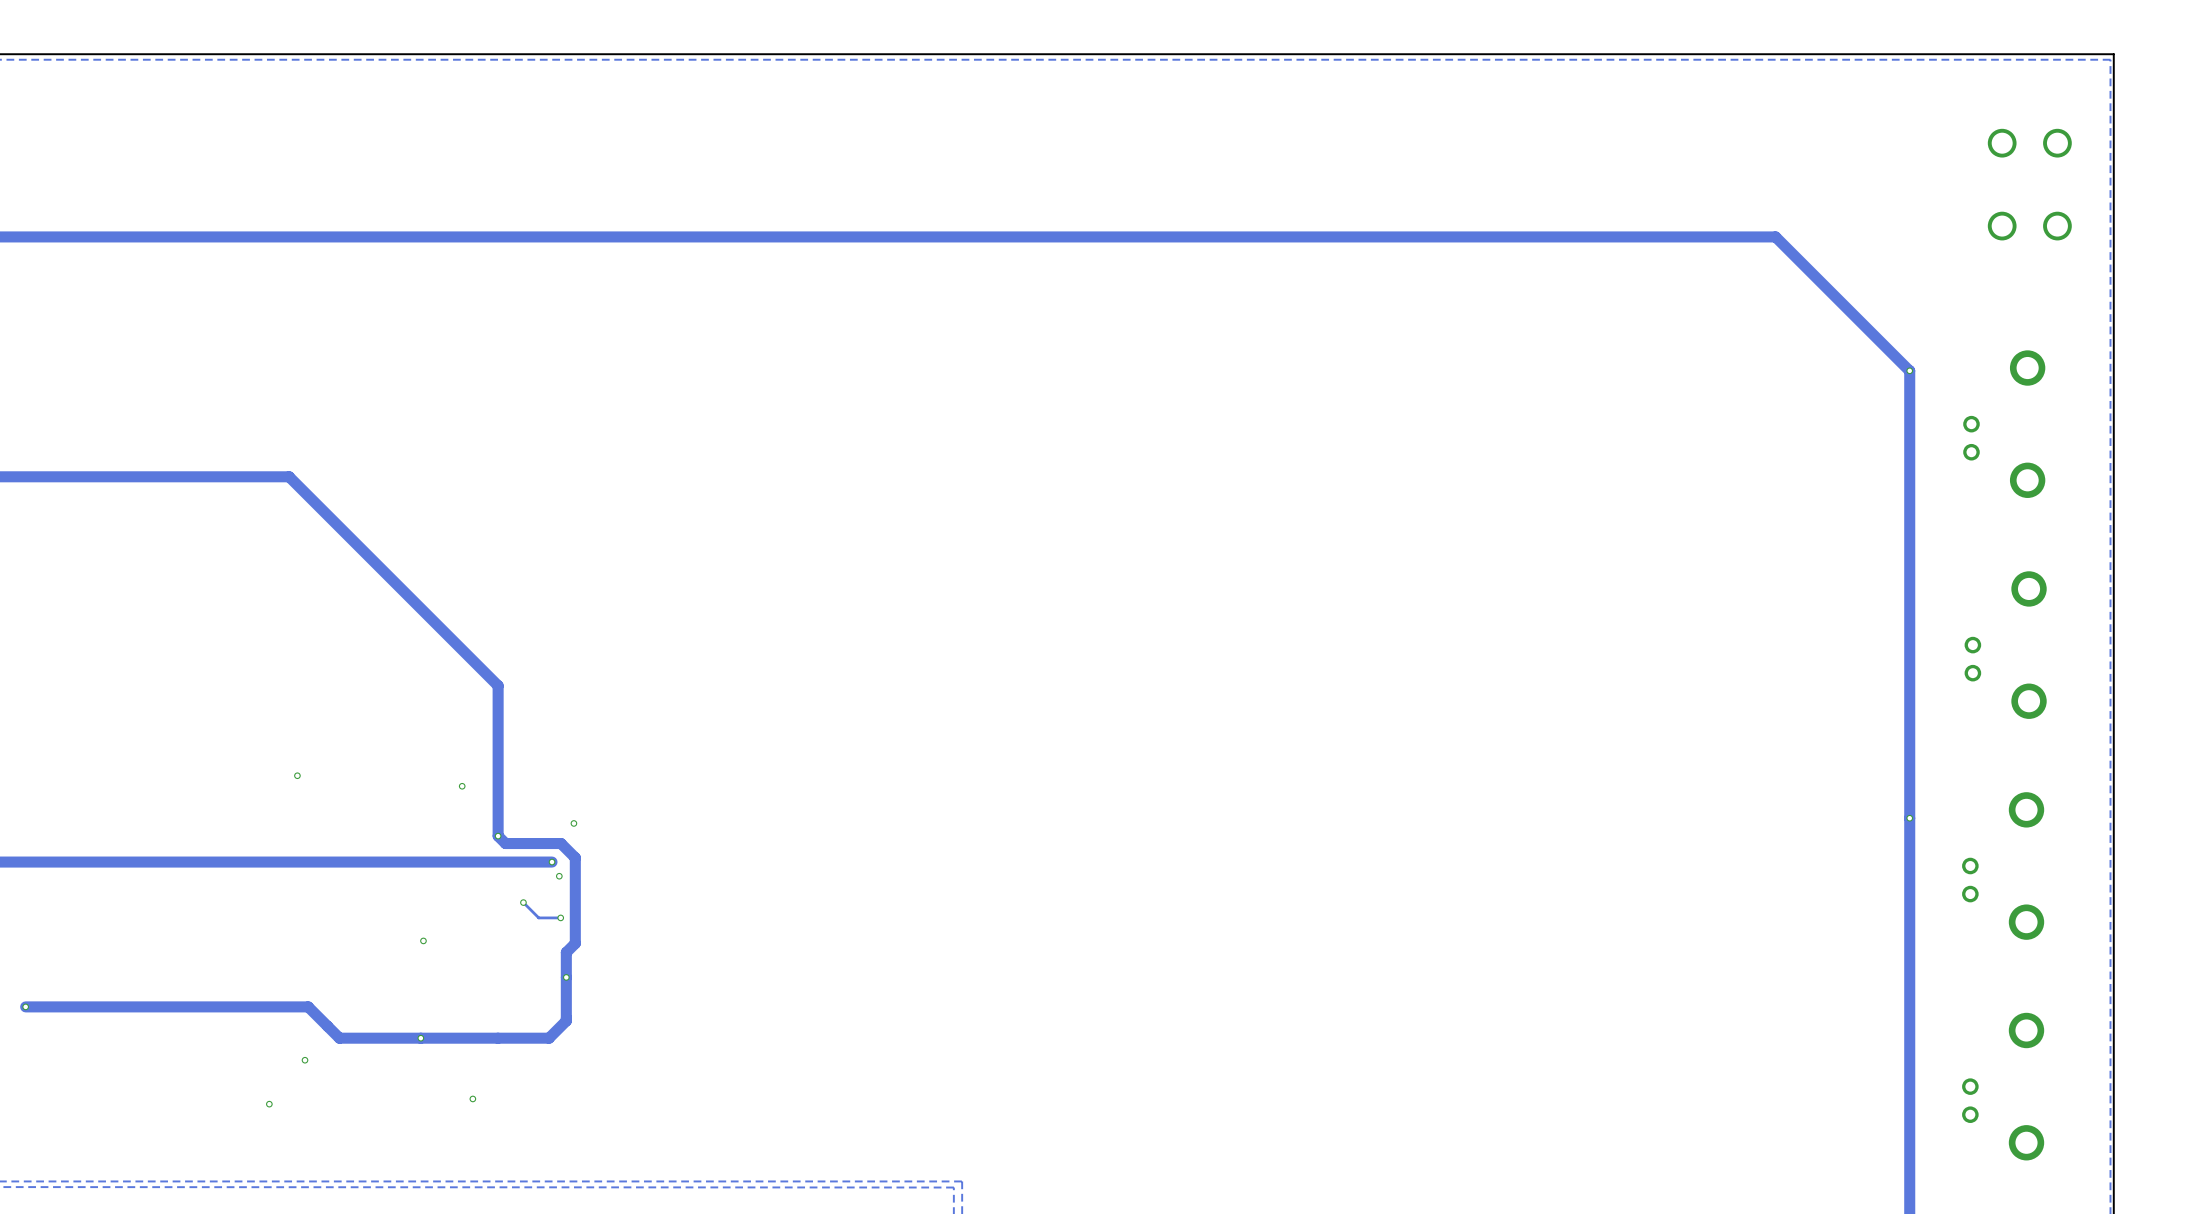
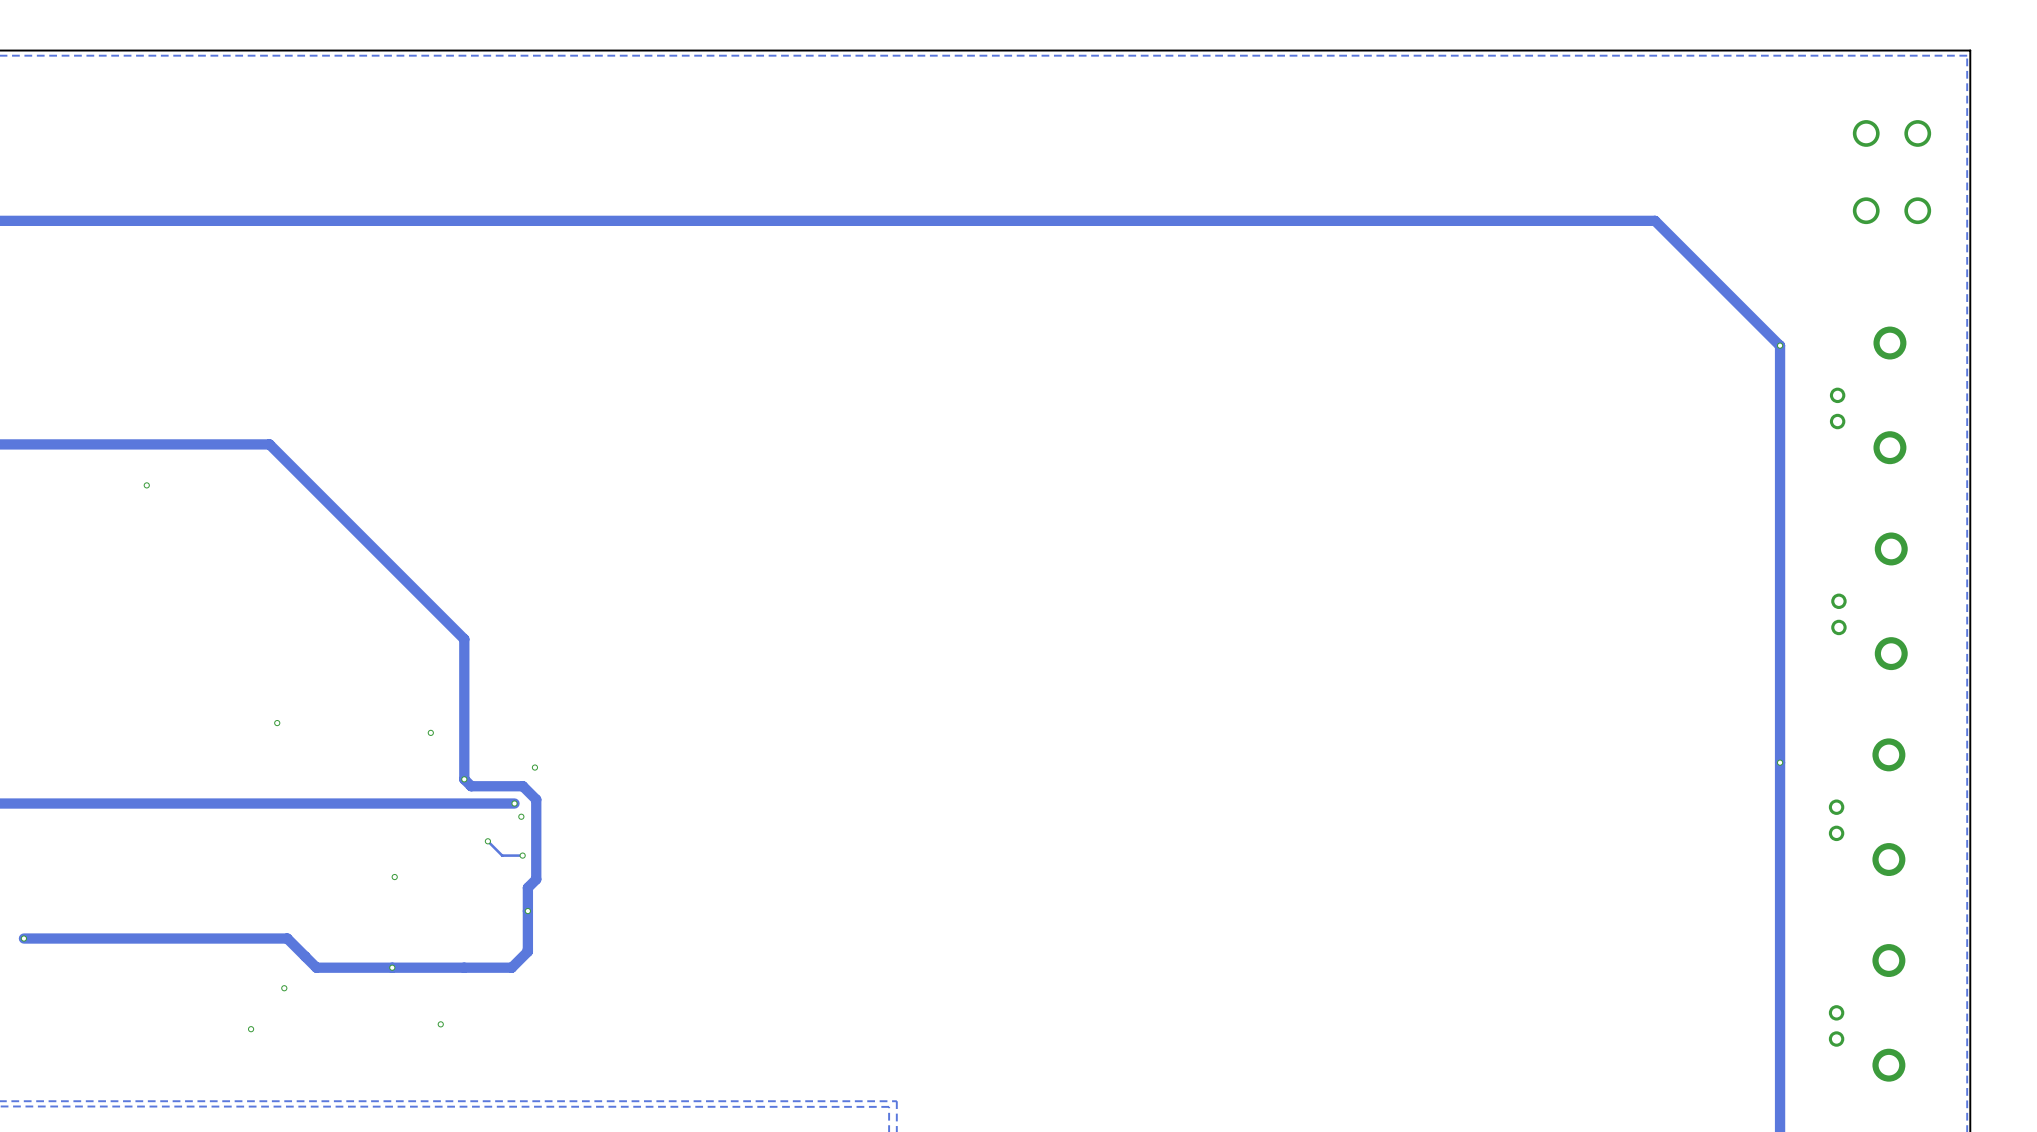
via: none -> (146, 485)

